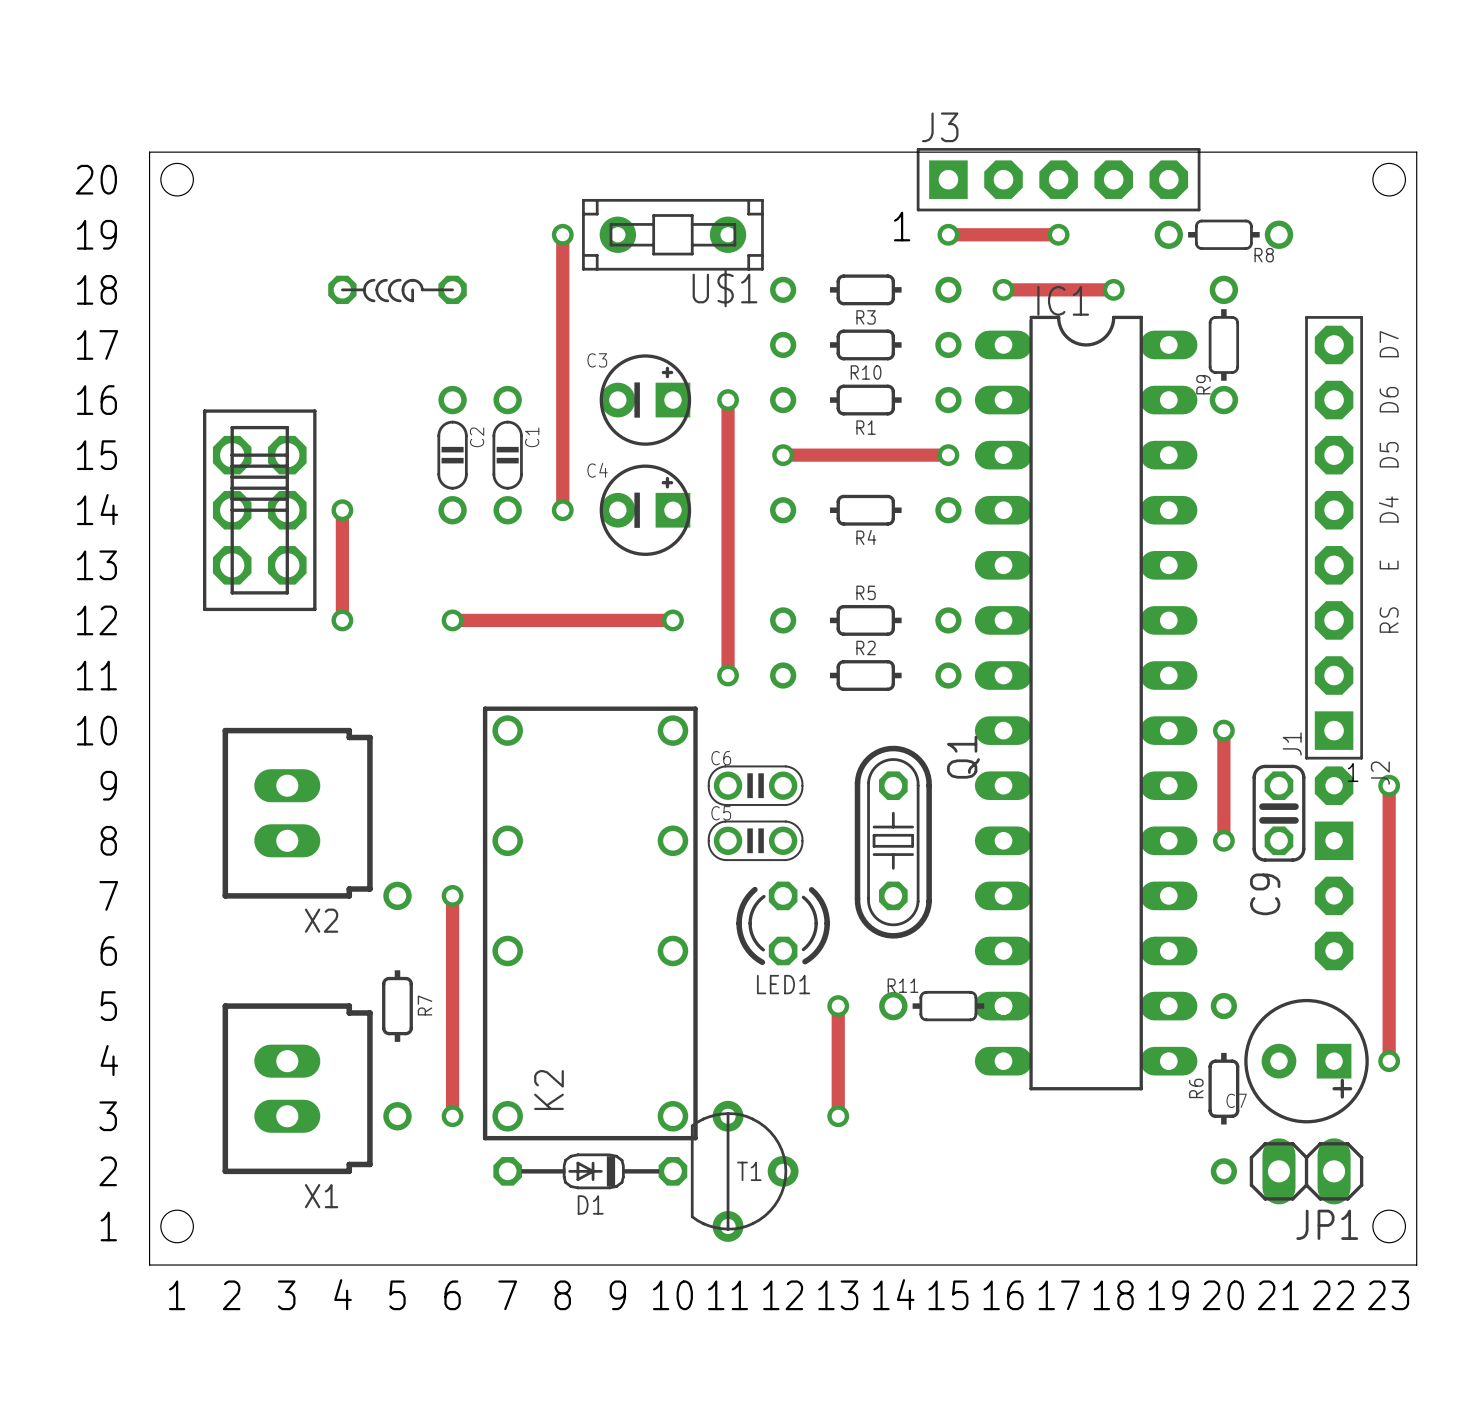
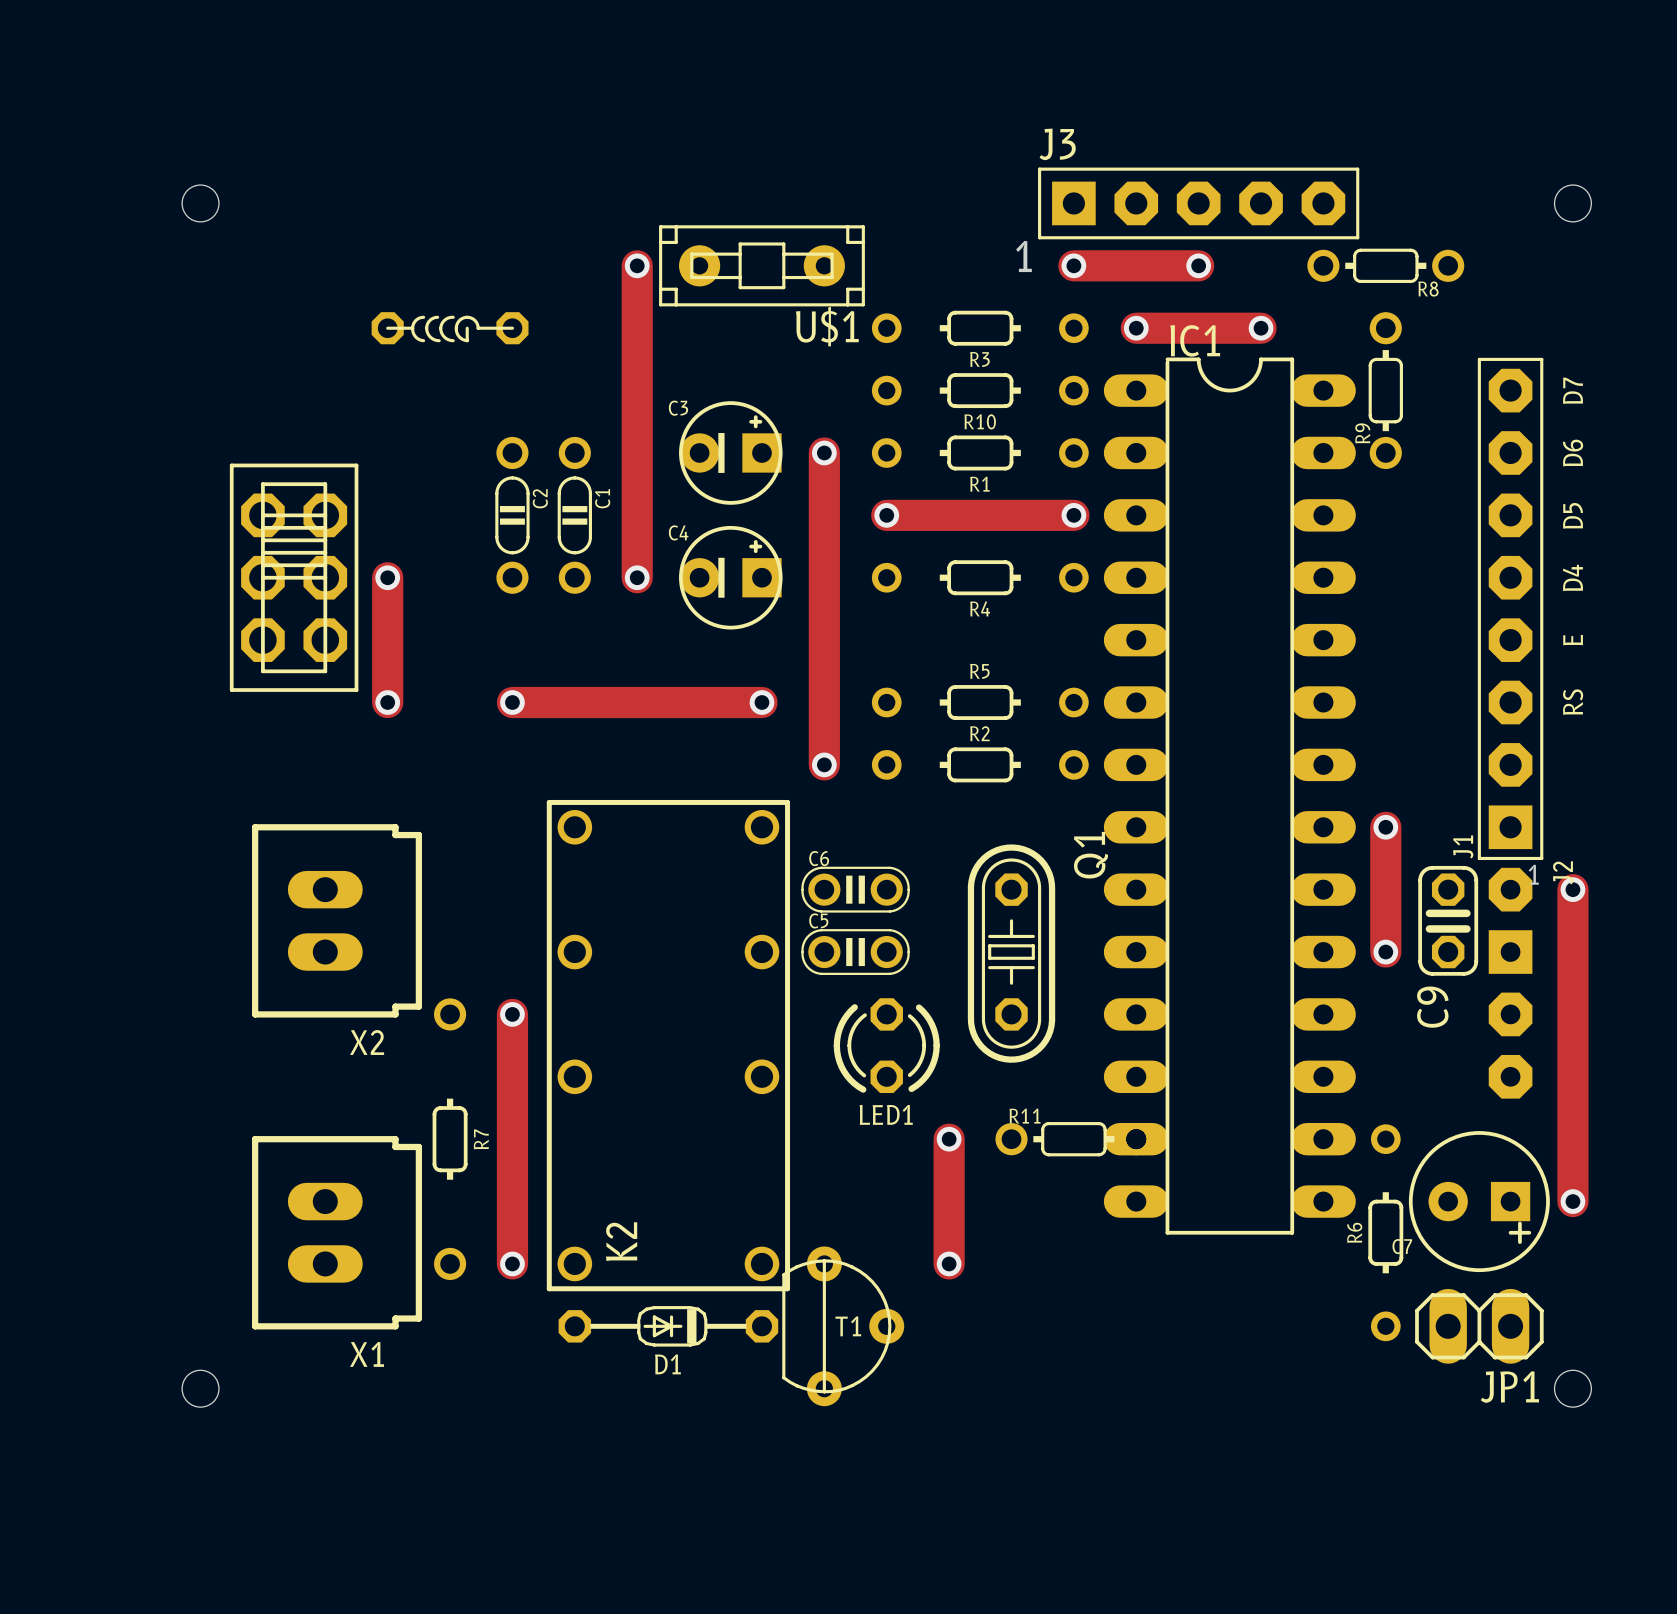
board edge: (149, 152) (1416, 152) (1416, 1265) (149, 1265) (149, 152) -> none
text: 20 (96, 179) -> none
text: 19 (96, 234) -> none
track width: thin (562, 234) (562, 510) -> thick (637, 265) (637, 577)
track width: thin (948, 234) (1058, 234) -> thick (1073, 265) (1198, 265)
text: 18 (96, 289) -> none
track width: thin (1003, 289) (1113, 289) -> thick (1136, 328) (1261, 328)
text: 17 (97, 344) -> none
text: 16 (96, 400) -> none
track width: thin (728, 400) (728, 675) -> thick (824, 452) (824, 764)
text: 15 (96, 455) -> none
track width: thin (783, 455) (948, 455) -> thick (886, 515) (1073, 515)
text: 14 (97, 509) -> none
track width: thin (342, 510) (342, 620) -> thick (387, 577) (387, 702)
text: 13 (96, 565) -> none
text: 12 (96, 620) -> none
track width: thin (452, 620) (672, 620) -> thick (512, 702) (761, 702)
text: 11 (96, 675) -> none
text: 10 (96, 730) -> none
track width: thin (1223, 730) (1223, 840) -> thick (1385, 827) (1385, 952)
text: 9 (108, 785) -> none
track width: thin (1389, 785) (1389, 1061) -> thick (1572, 889) (1572, 1201)
text: 8 (108, 840) -> none
text: 7 (108, 895) -> none
track width: thin (452, 895) (452, 1116) -> thick (512, 1014) (512, 1263)
text: 6 (108, 950) -> none
text: 5 (108, 1006) -> none
track width: thin (838, 1006) (838, 1116) -> thick (949, 1139) (949, 1263)
text: 4 (109, 1060) -> none
text: 3 (108, 1116) -> none
text: 2 (108, 1171) -> none
text: 1 (108, 1226) -> none
text: 4 (342, 1294) -> none
text: 14 (893, 1294) -> none
text: 1 (177, 1295) -> none
text: 2 (231, 1295) -> none
text: 3 (286, 1295) -> none
text: 5 (397, 1295) -> none
text: 6 (452, 1295) -> none
text: 7 (507, 1295) -> none
text: 8 (562, 1295) -> none
text: 9 (617, 1295) -> none
text: 10 (672, 1295) -> none
text: 11 (728, 1295) -> none
text: 12 (783, 1295) -> none
text: 13 (838, 1295) -> none
text: 15 (948, 1295) -> none
text: 16 (1003, 1295) -> none
text: 17 (1059, 1295) -> none
text: 18 (1113, 1295) -> none
text: 19 (1168, 1295) -> none
text: 20 (1223, 1295) -> none
text: 21 (1278, 1295) -> none
text: 22 (1333, 1295) -> none
text: 23 (1388, 1295) -> none

